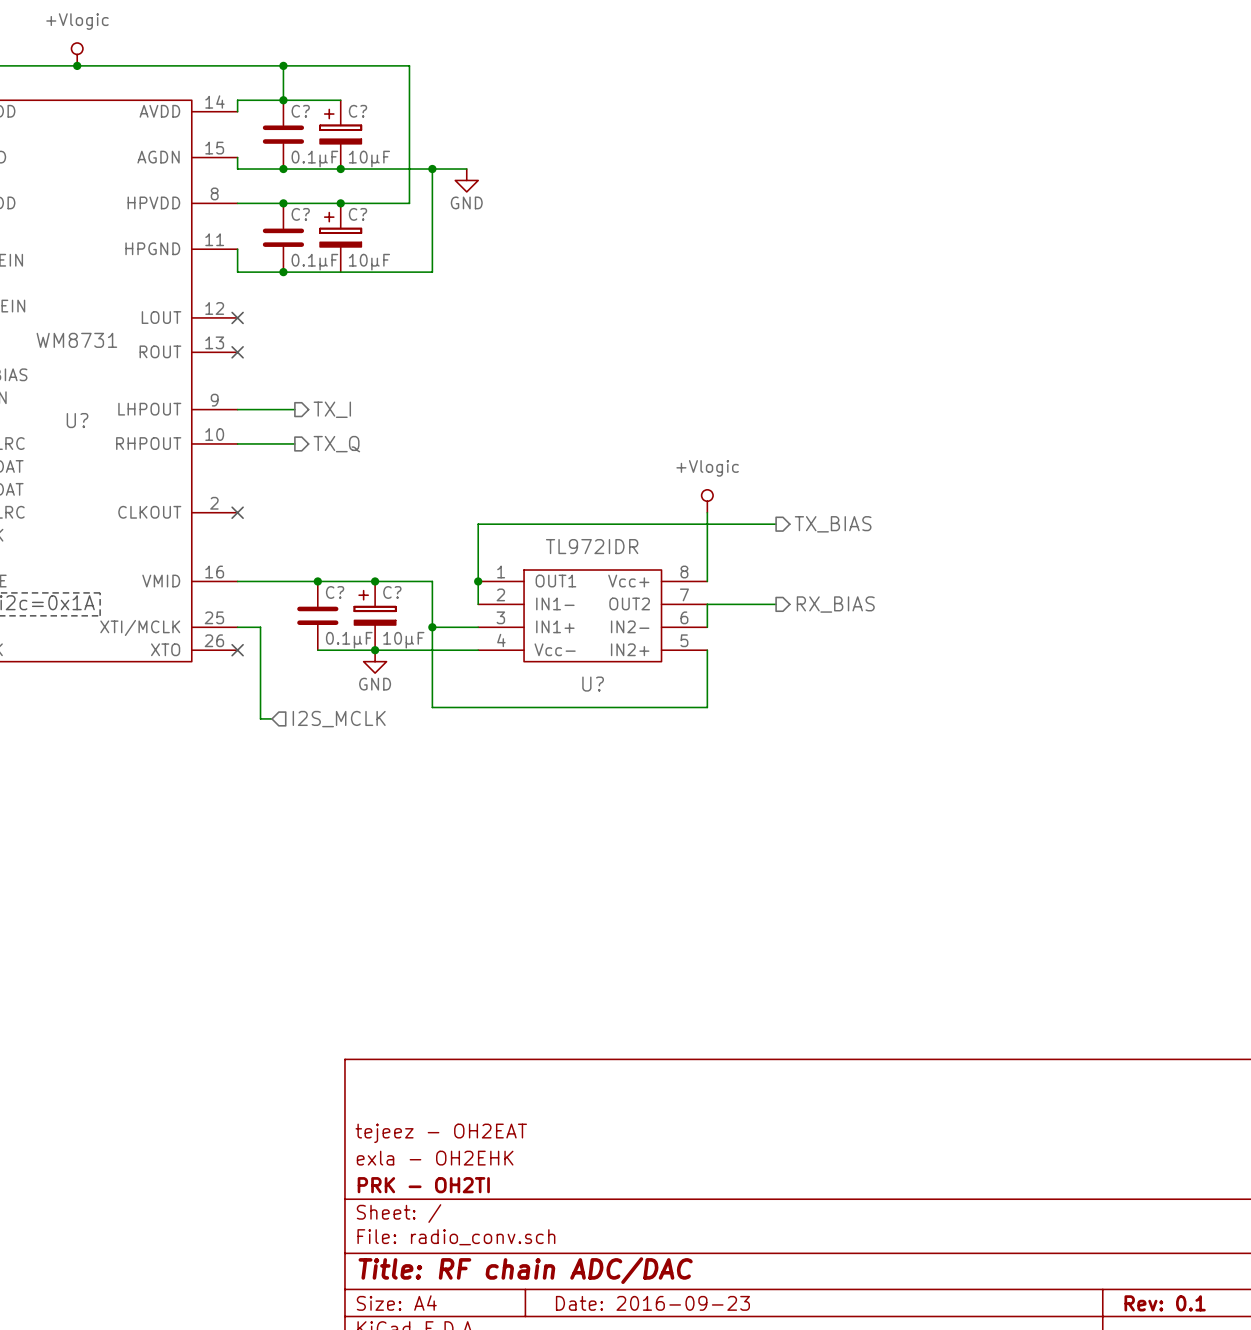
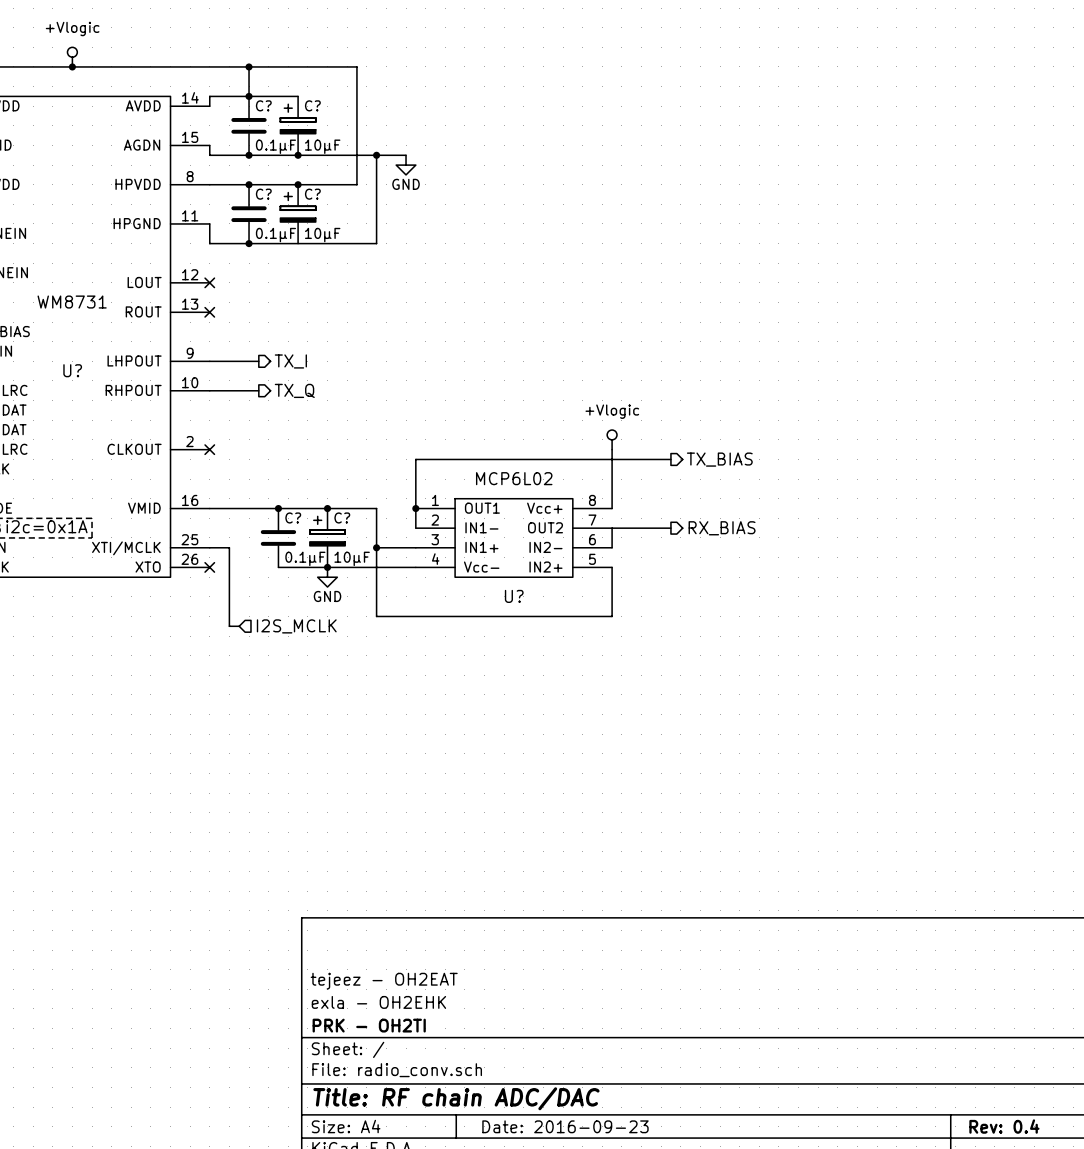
U? value: TL972IDR (592, 546) -> MCP6L02 (514, 478)
title block: Rev: 0.1 (1165, 1303) -> Rev: 0.4 (1004, 1126)

